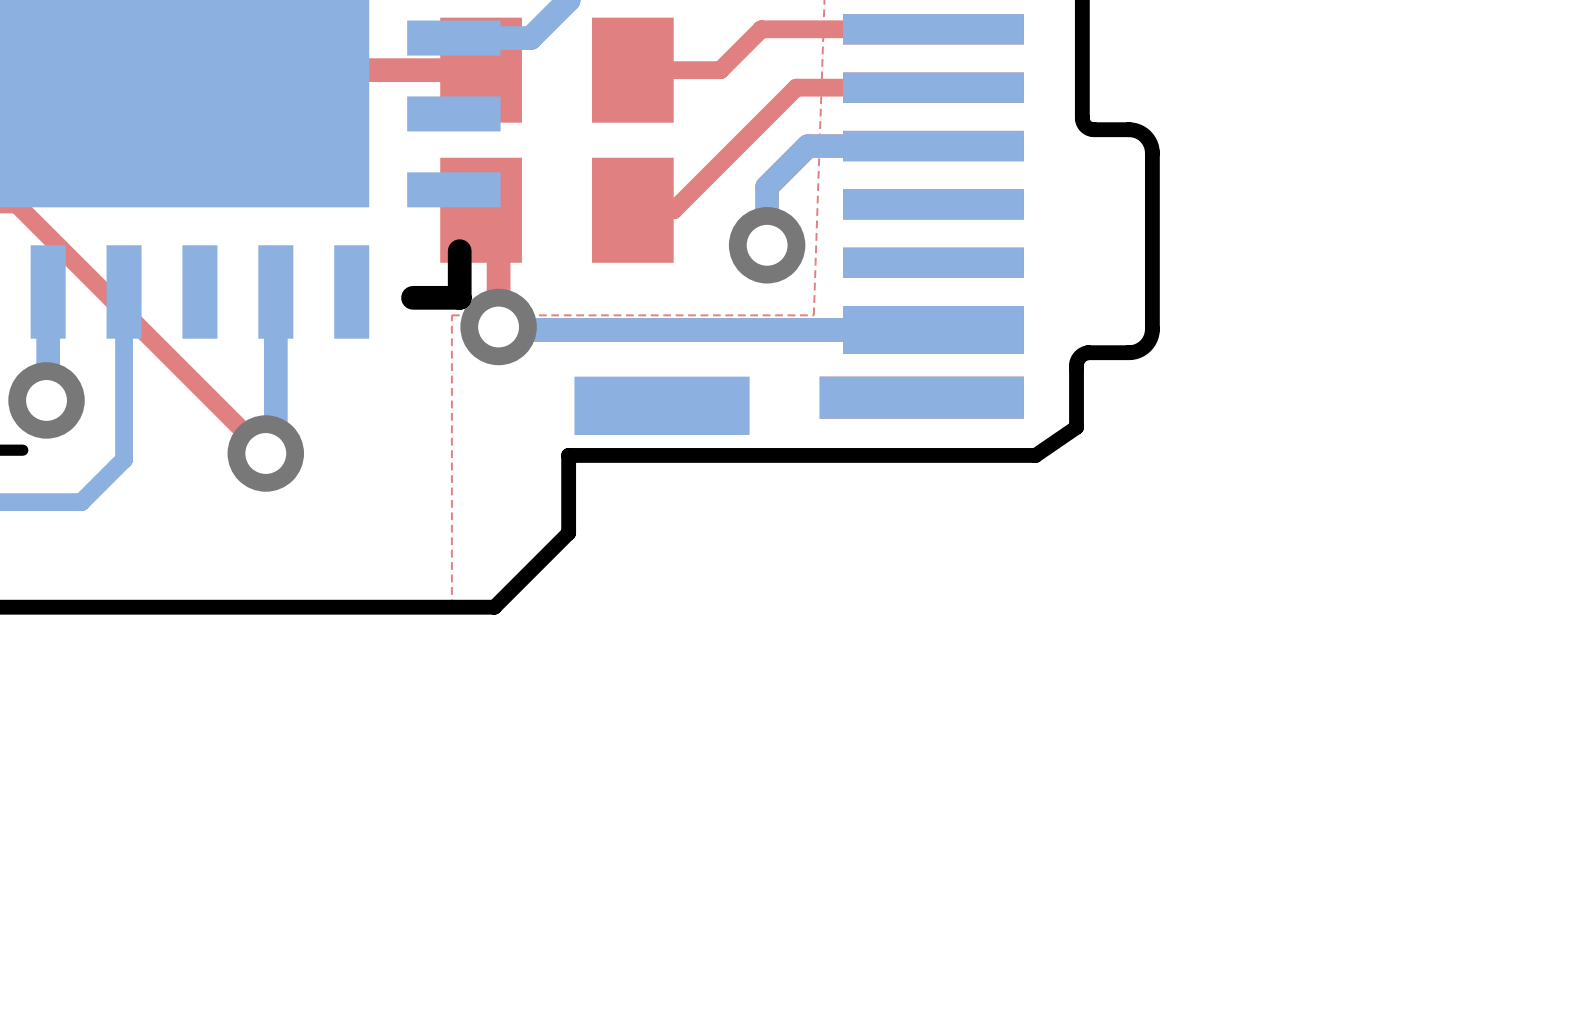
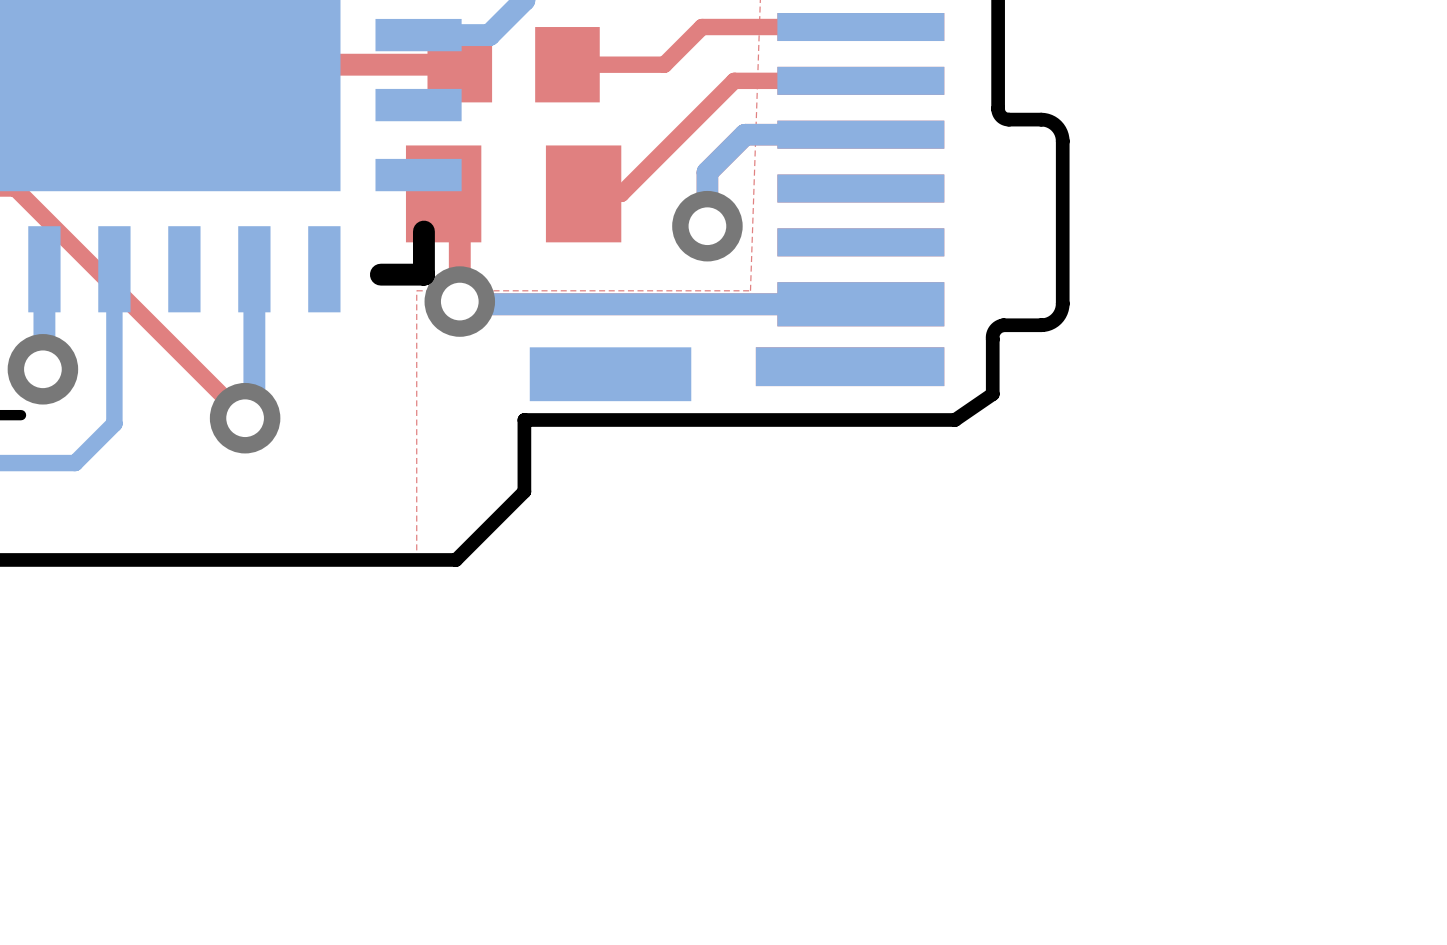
part footprint: [440, 17, 674, 123] -> [427, 27, 600, 103]

